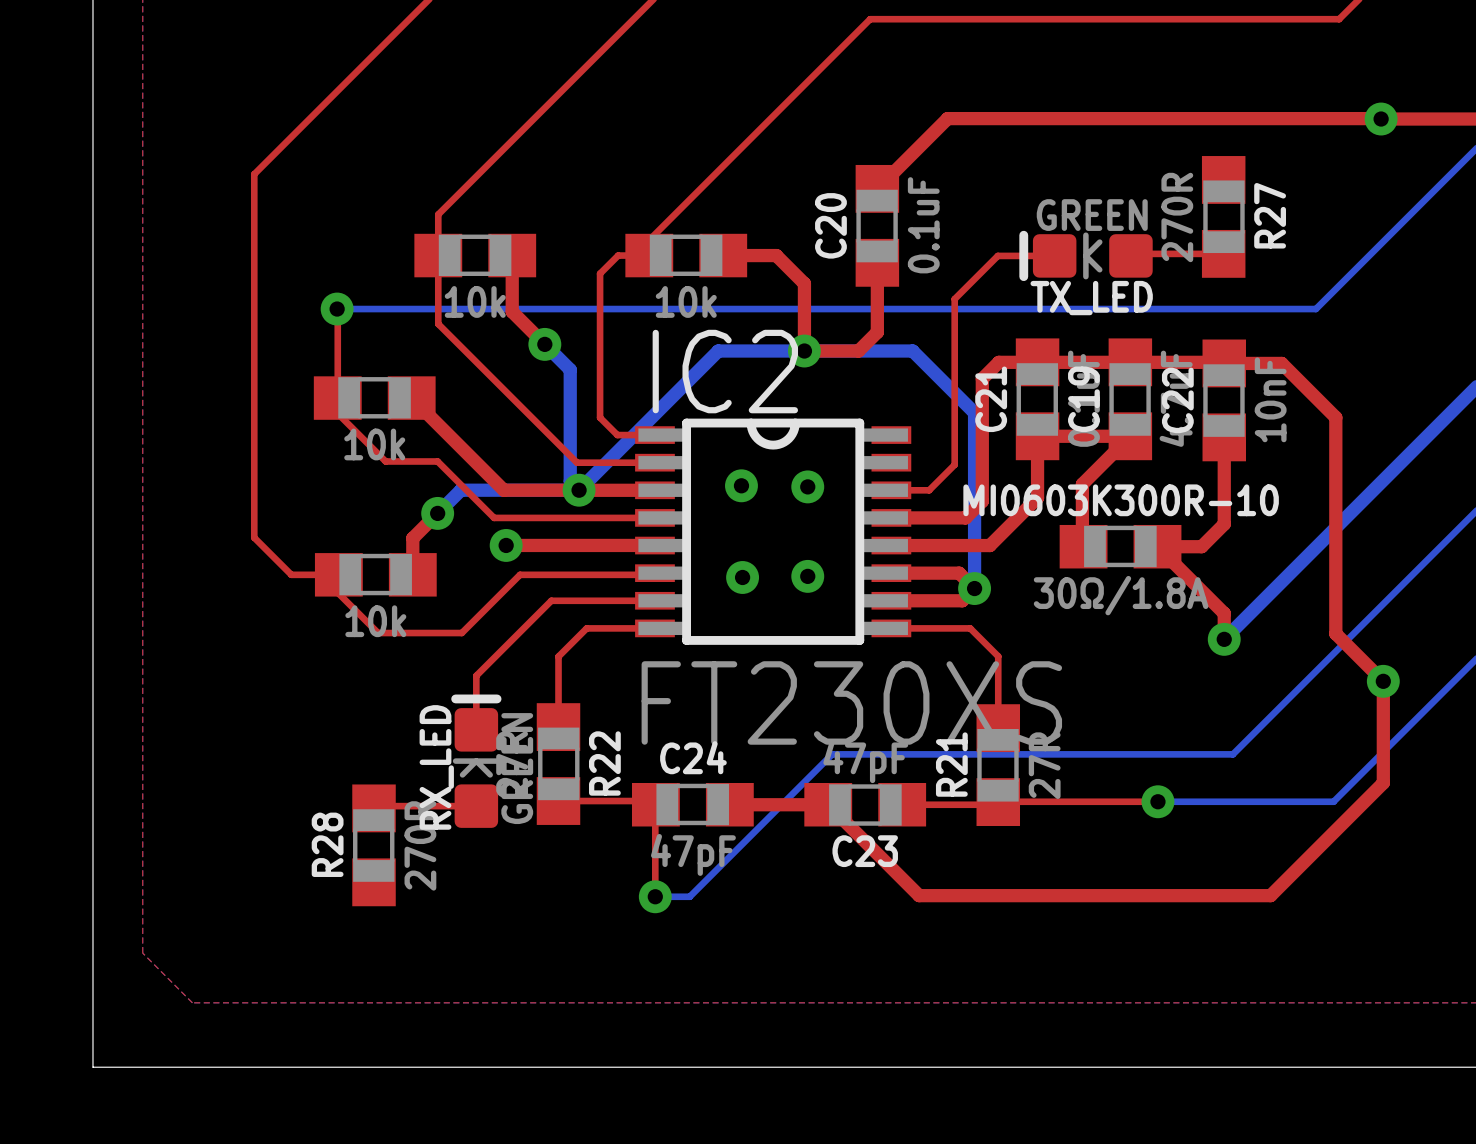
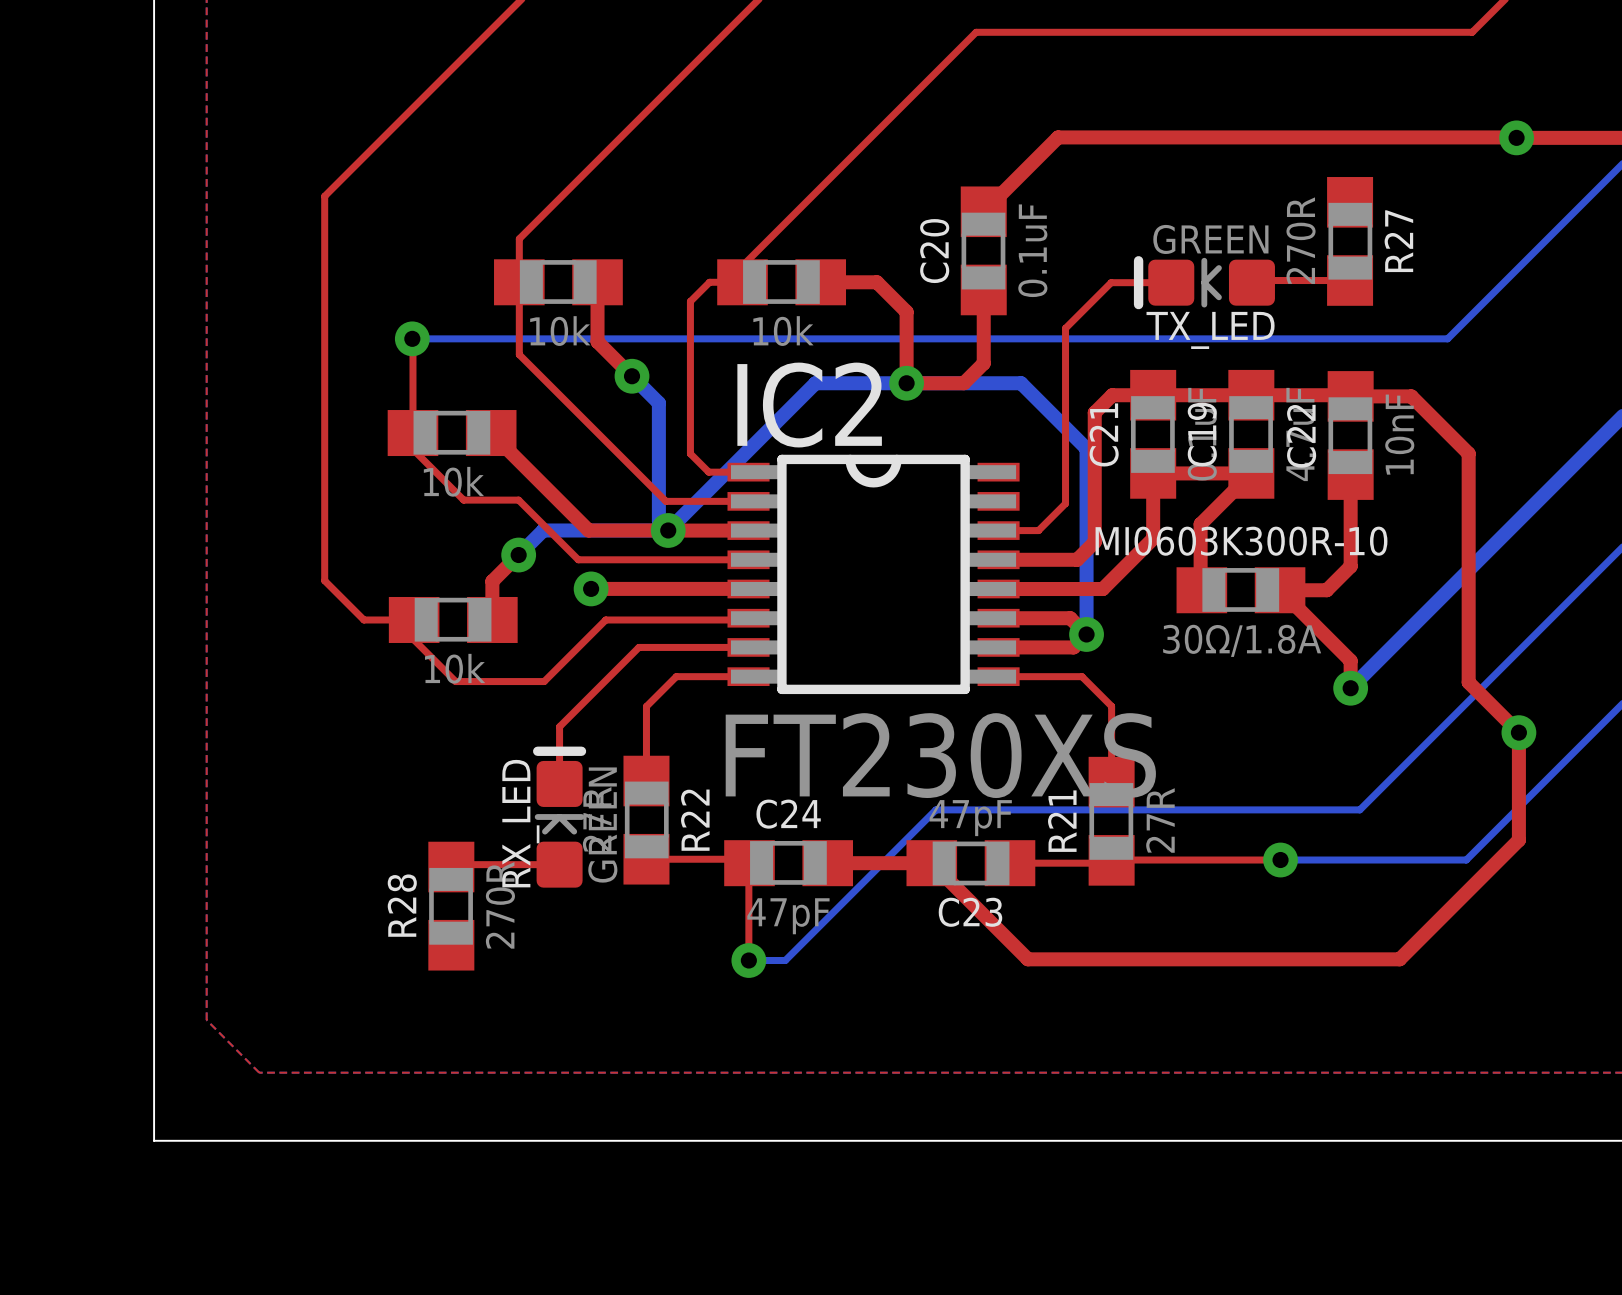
via: (741, 485) -> none
via: (807, 486) -> none
via: (807, 576) -> none
via: (742, 577) -> none

